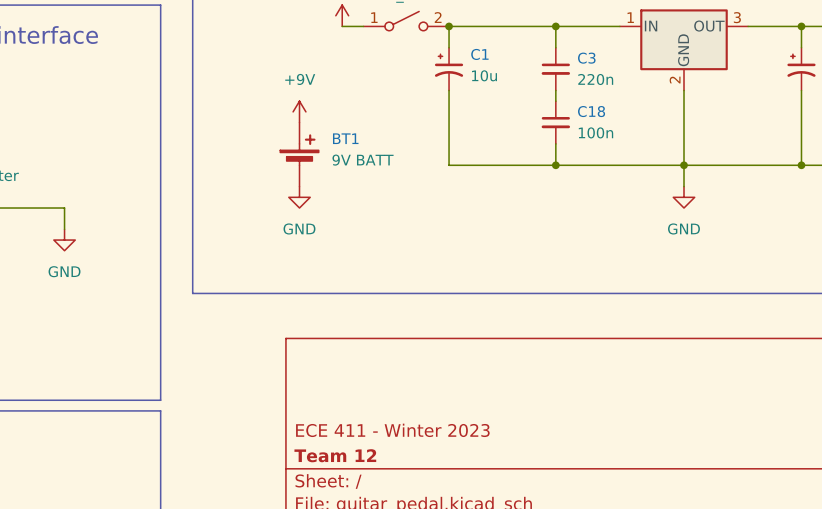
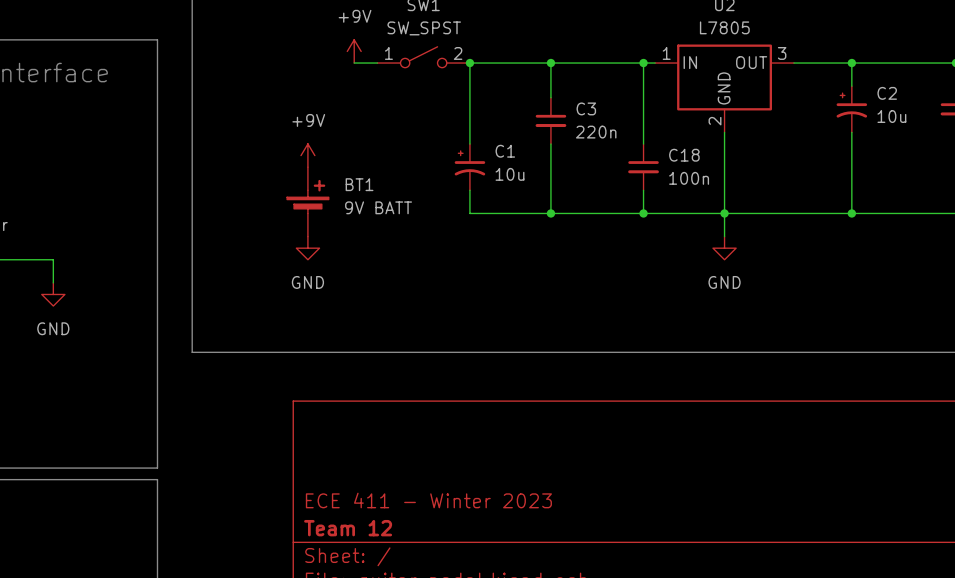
wire: none -> (550, 63) (550, 97)
junction: none -> (550, 63)
wire: (555, 26) (555, 47) -> none
junction: (555, 26) -> none
wire: none -> (643, 63) (643, 144)
junction: none -> (643, 63)
C1 position: (449, 69) -> (469, 167)
C3 position: (555, 69) -> (550, 120)
wire: (555, 90) (555, 101) -> none
wire: none -> (550, 144) (550, 213)
C18 position: (555, 122) -> (643, 167)
wire: (555, 143) (555, 165) -> (643, 190) (643, 213)
junction: none -> (550, 213)
junction: (555, 165) -> none
junction: none -> (643, 213)

